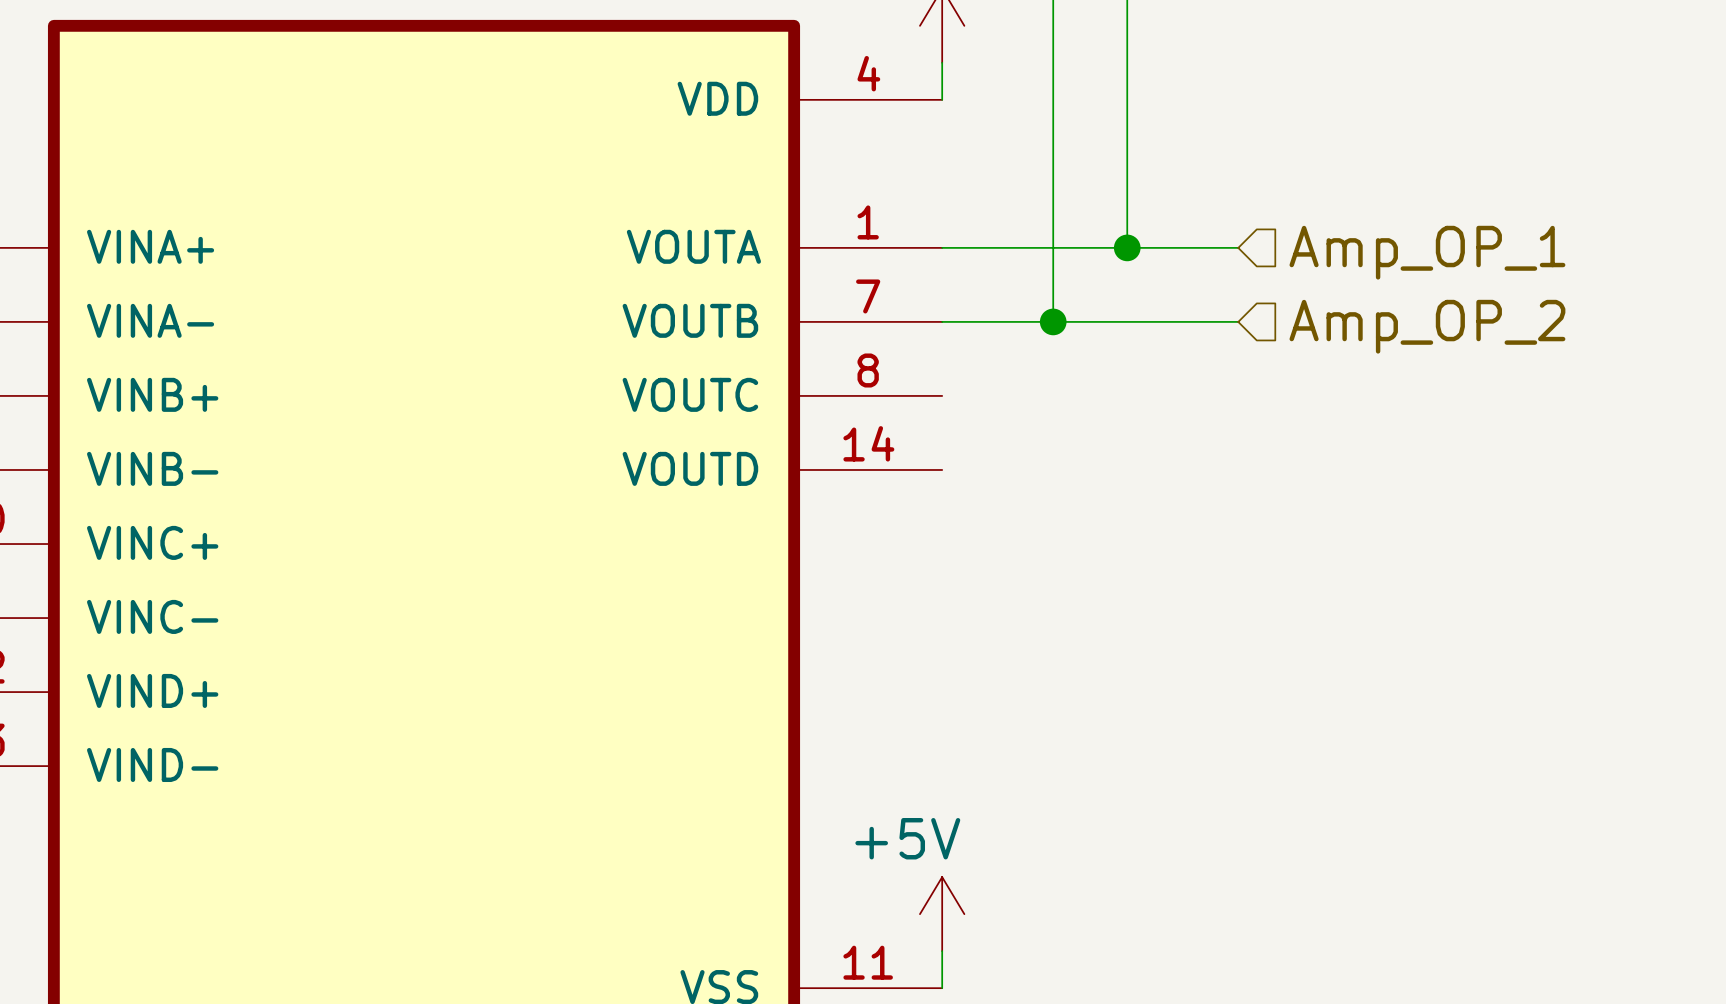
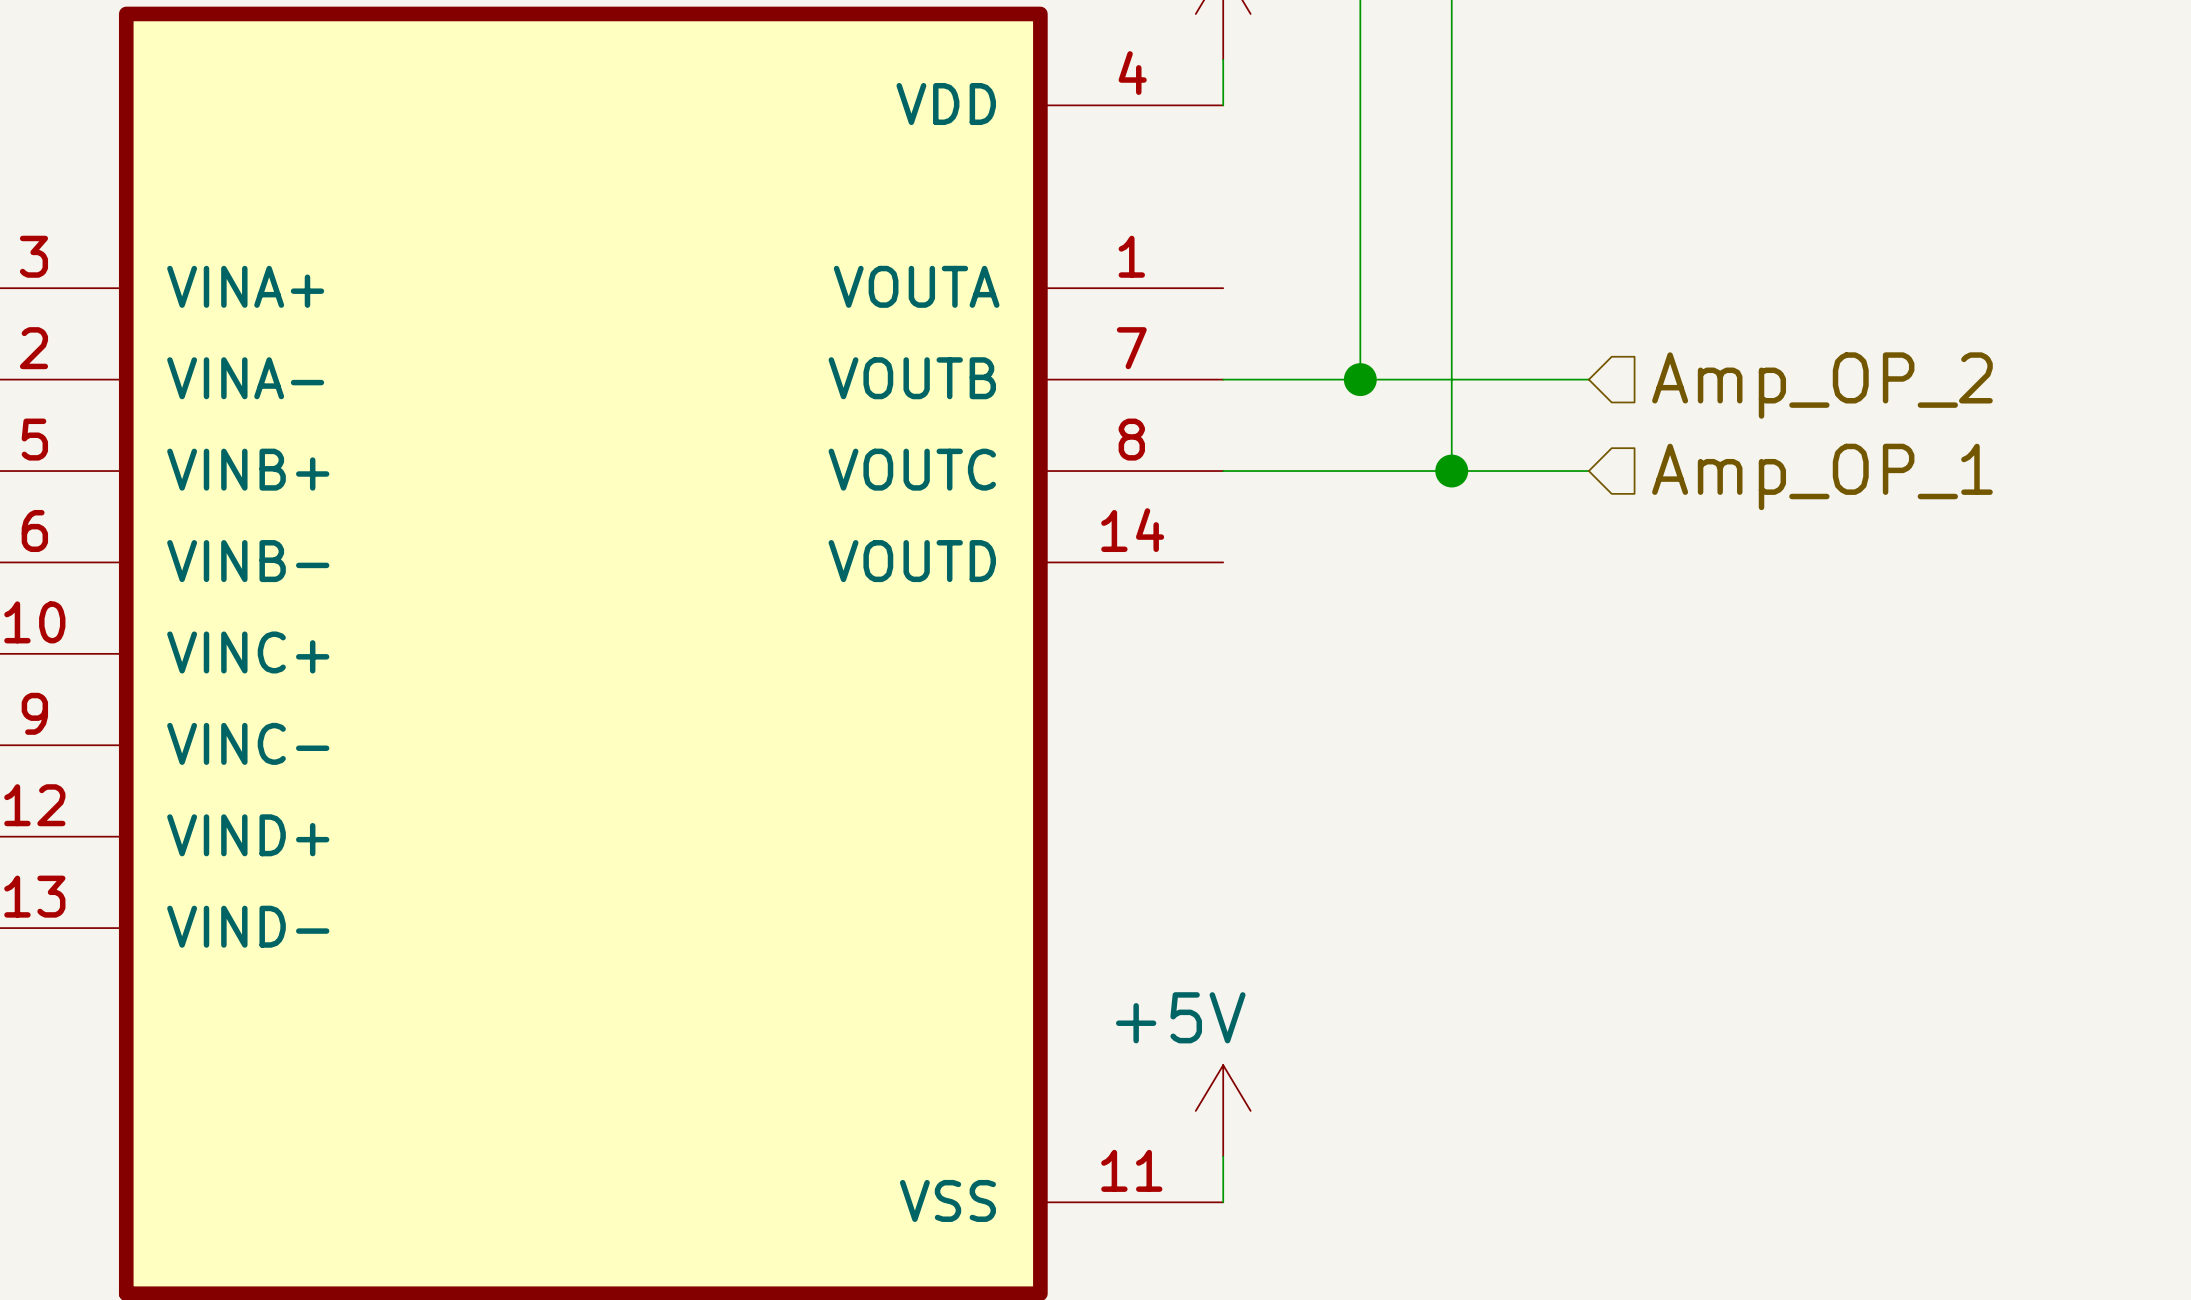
wire: (942, 247) (1238, 247) -> (1223, 471) (1588, 471)
wire: none -> (1451, 288) (1451, 471)
junction position: (1127, 247) -> (1451, 471)
hierarchical label position: Amp_OP_1 (1427, 252) -> Amp_OP_1 (1822, 476)

